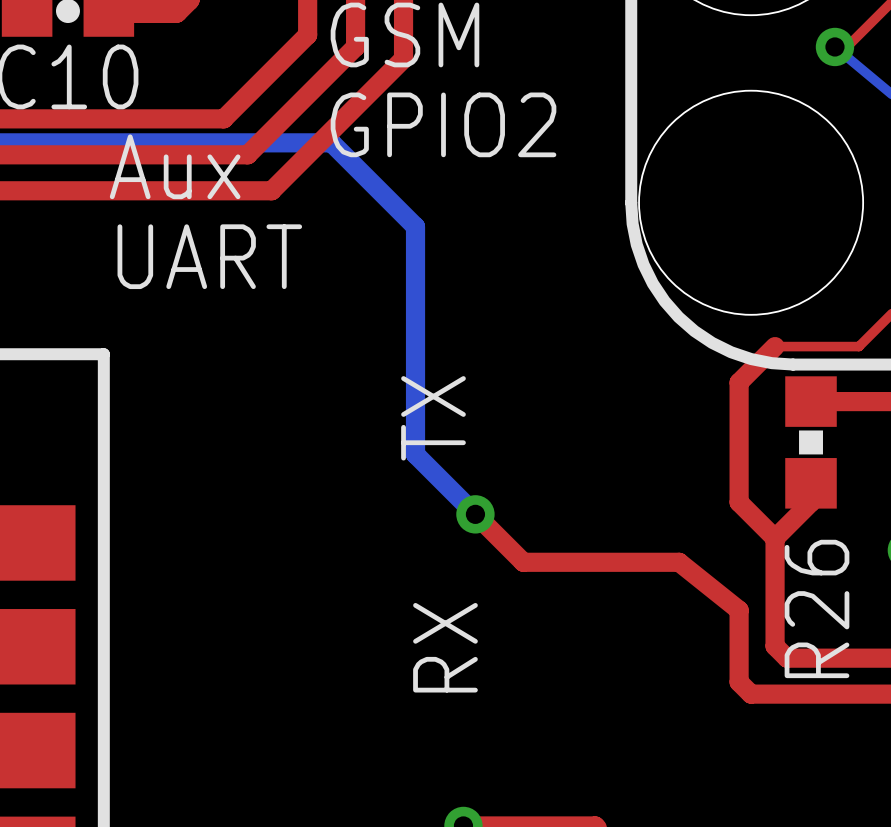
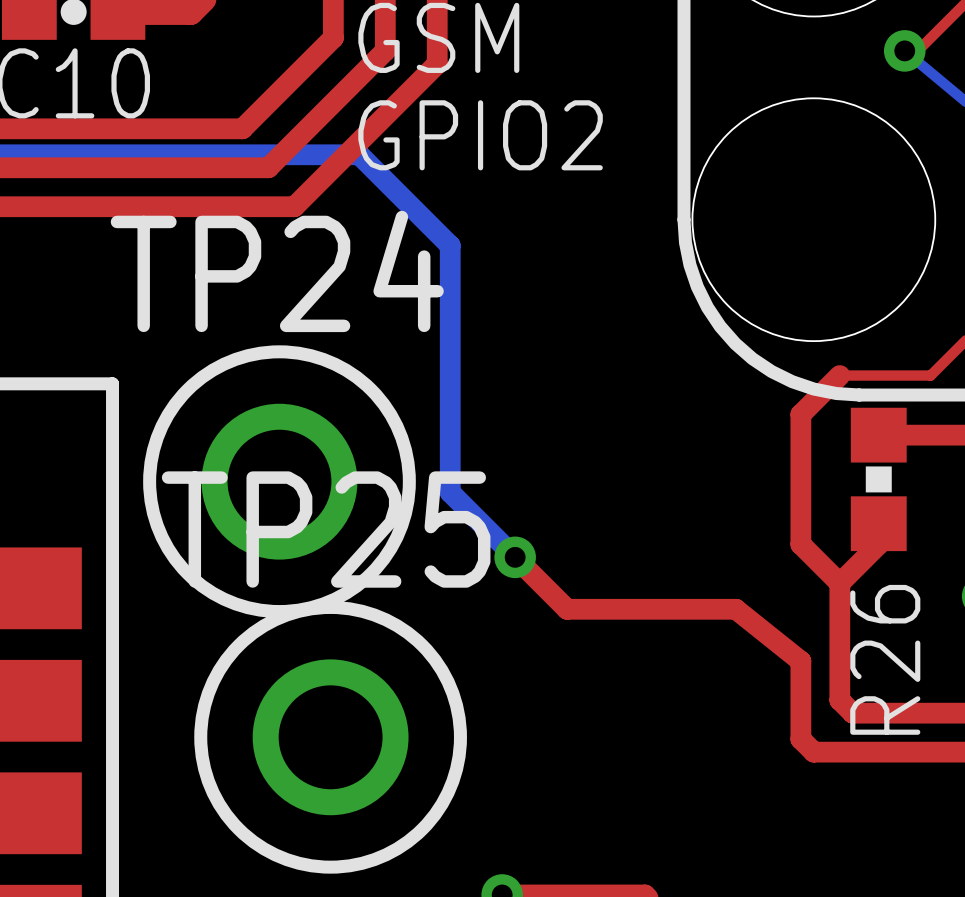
text: Aux (175, 166) -> none
text: UART (209, 256) -> none
text: TX (433, 418) -> none
TP24: none -> (279, 481)
text: RX (445, 647) -> none
TP25: none -> (330, 737)

